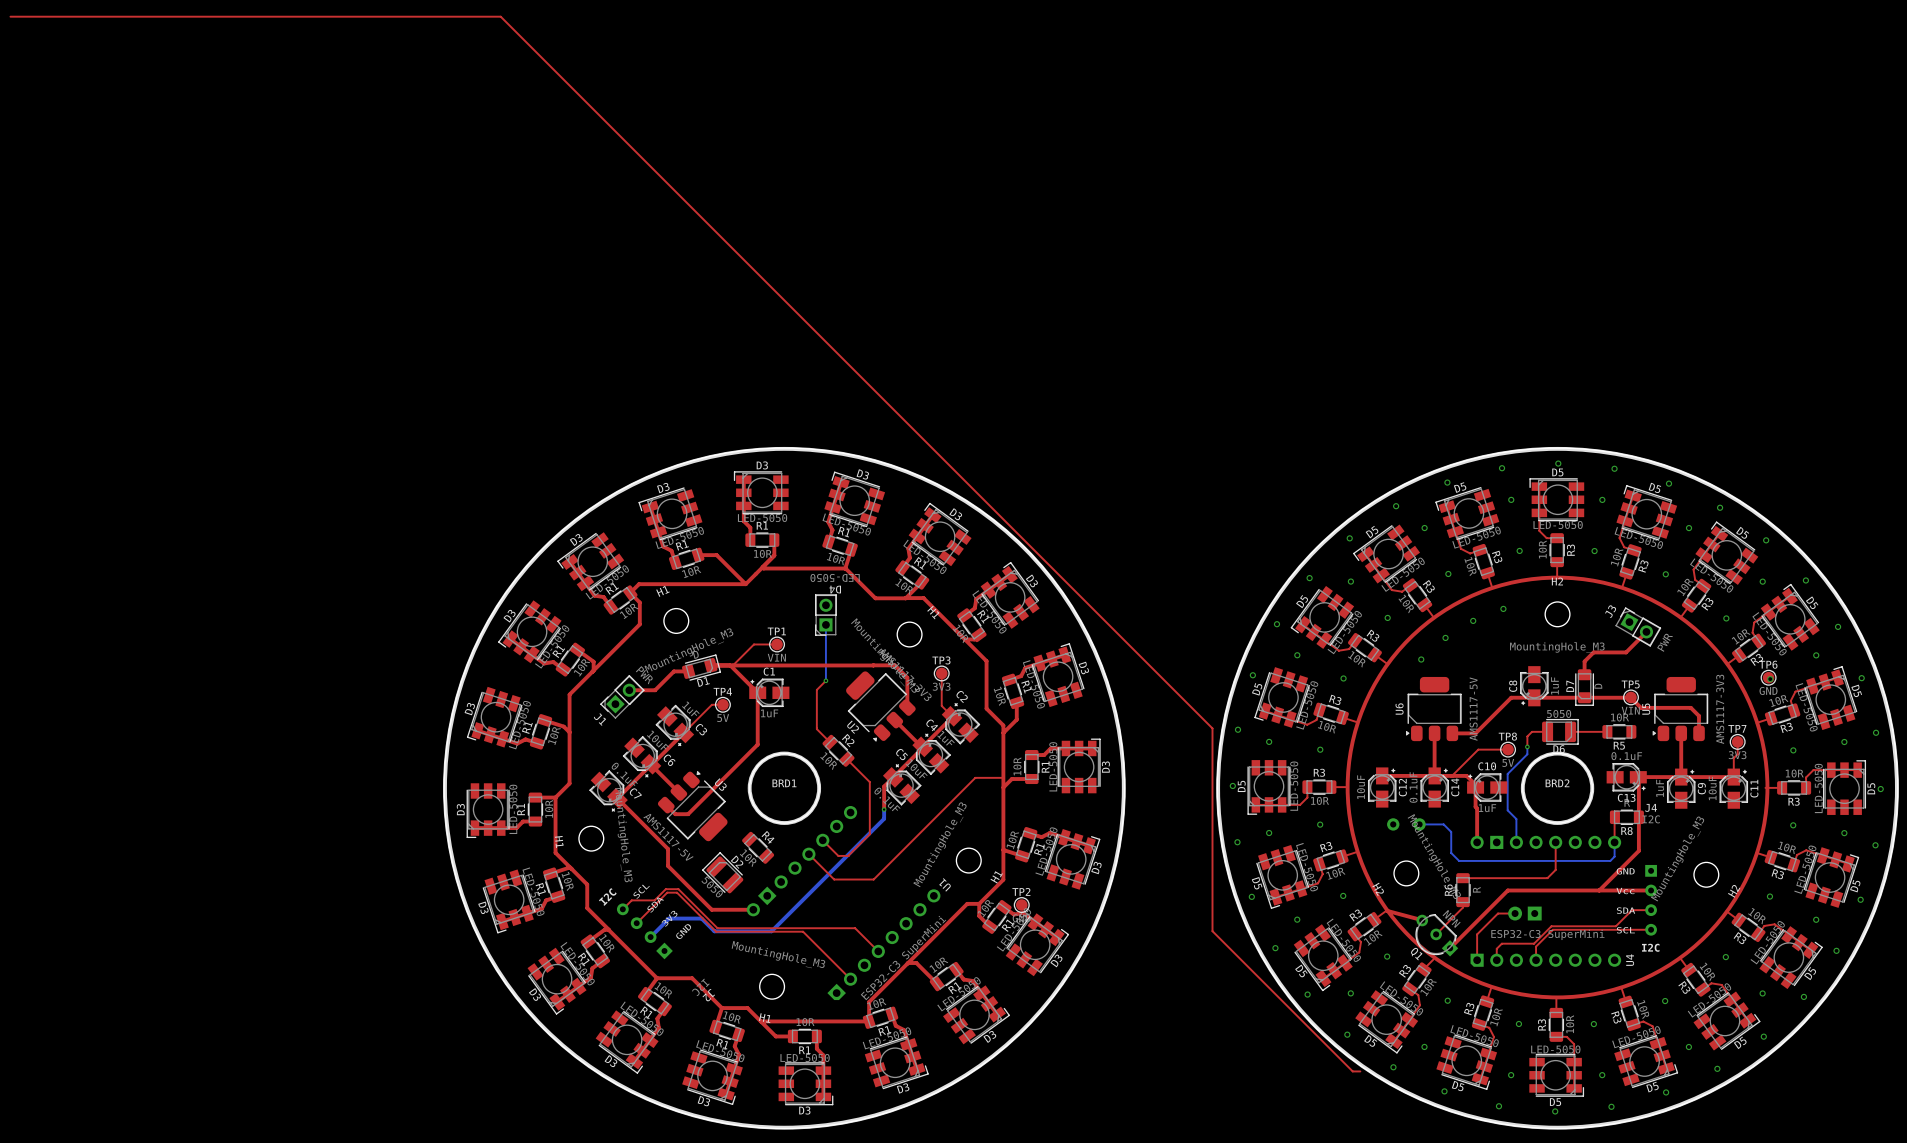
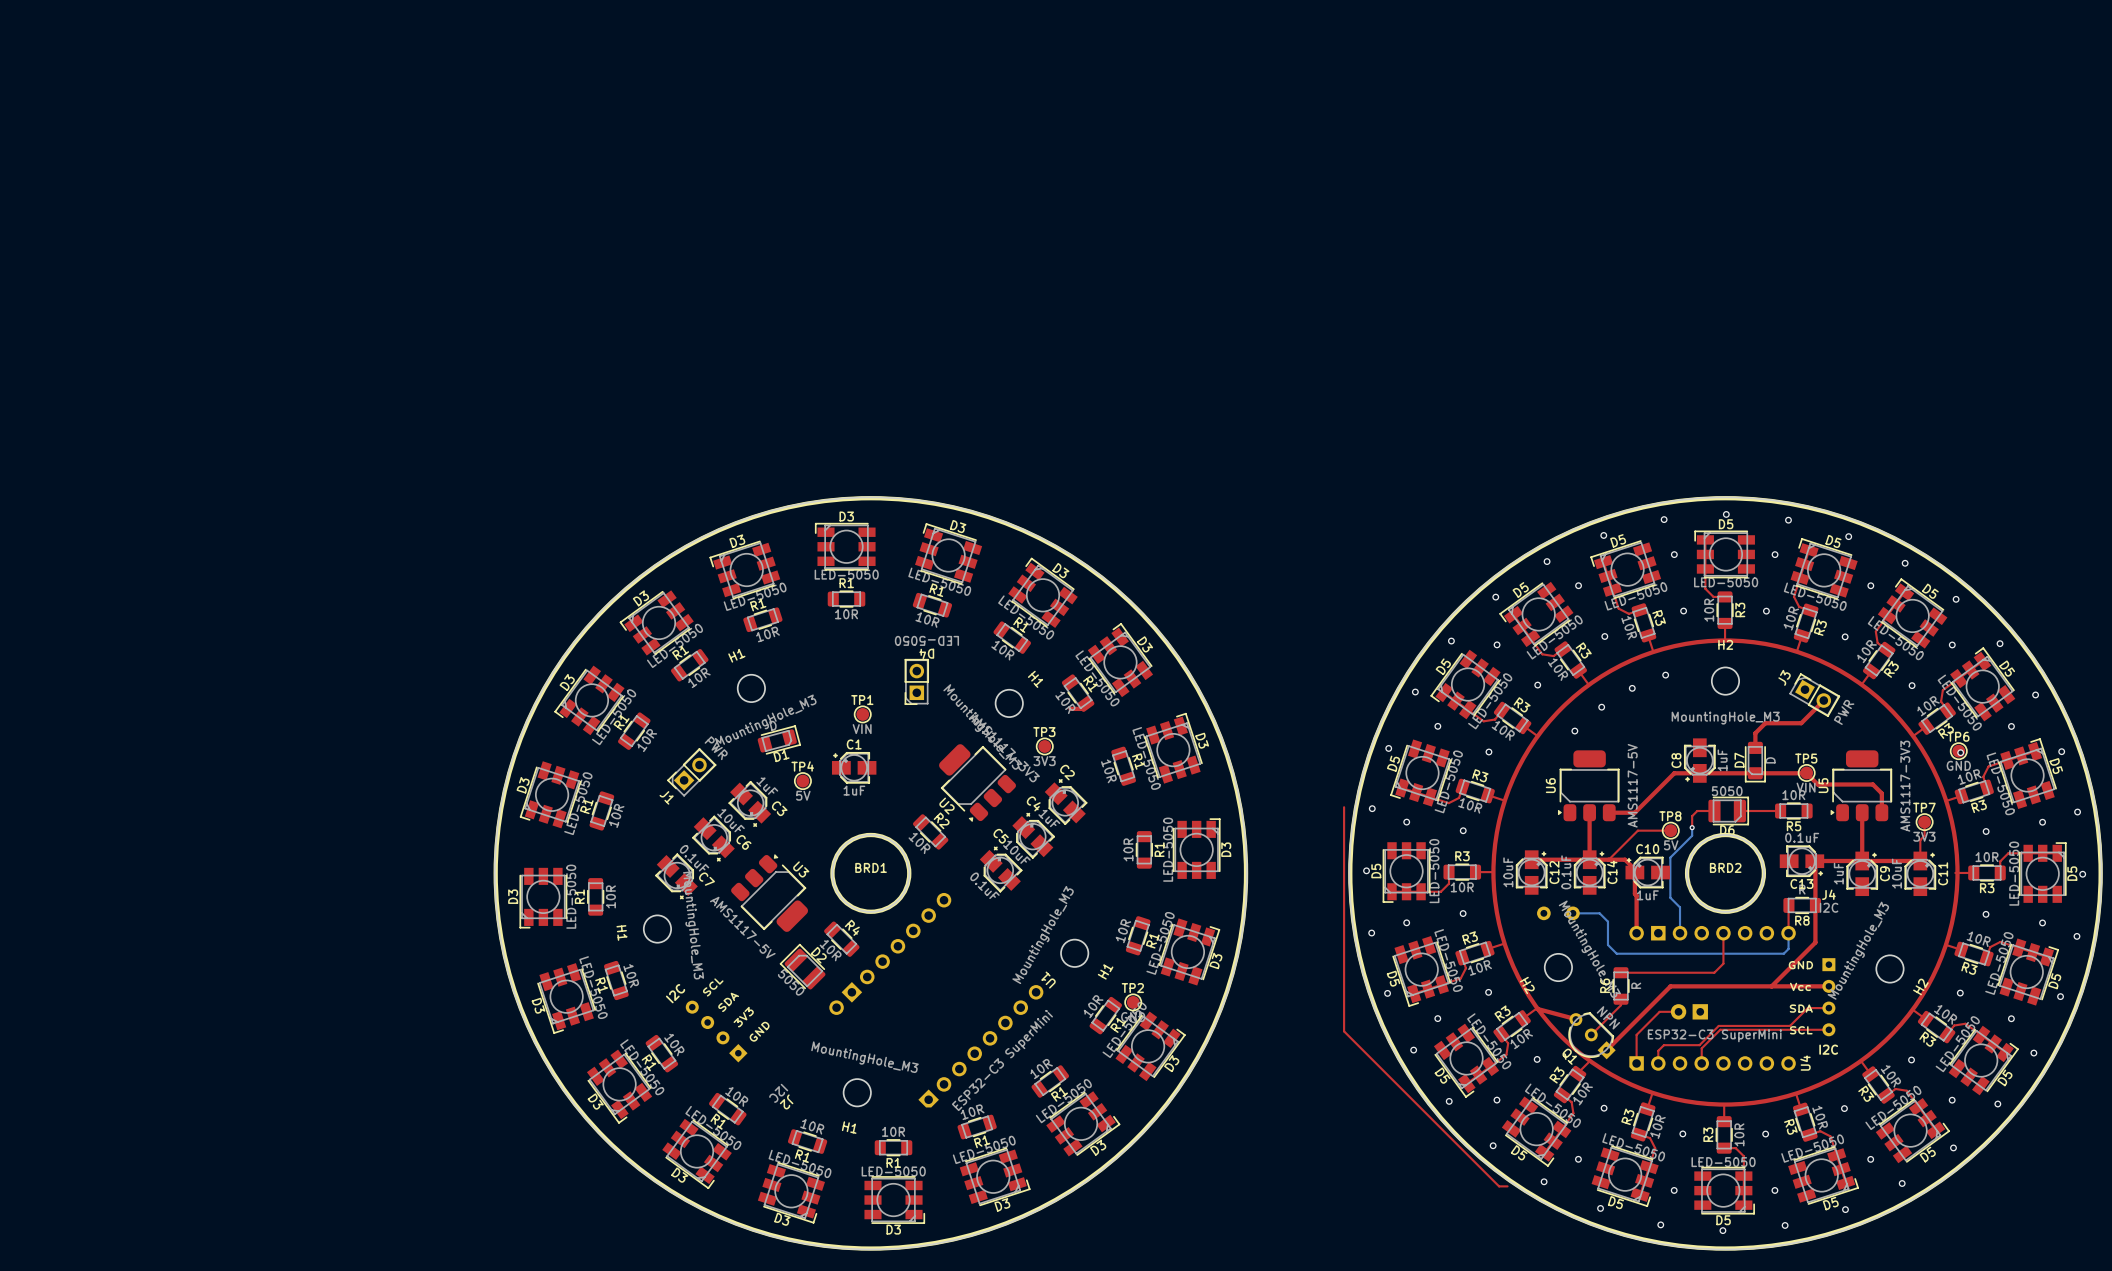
top track: (10, 16) (500, 16) (1212, 728) -> none
top track: (743, 479) (743, 521) (750, 527) (750, 540) -> none
top track: (841, 482) (828, 521) (832, 530) (828, 541) -> none
top track: (650, 507) (663, 546) (671, 550) (675, 562) -> none
top track: (932, 515) (908, 548) (909, 557) (902, 567) -> none
top track: (774, 540) (774, 555) (745, 584) -> none
top track: (851, 549) (845, 568) -> none
top track: (698, 555) (716, 555) (745, 584) -> none
top track: (569, 562) (594, 595) (603, 597) (610, 607) -> none
top track: (762, 567) (845, 568) (875, 598) (905, 598) (921, 582) -> none
top track: (1009, 574) (976, 599) (974, 608) (964, 615) -> none
top track: (745, 584) (639, 584) (630, 592) (639, 602) (639, 624) (569, 694) (569, 783) (555, 797) -> none
top track: (905, 598) (923, 598) (986, 661) (986, 708) (1003, 725) (1003, 879) (979, 903) -> none
bottom track: (825, 624) (825, 680) -> none
top track: (510, 639) (544, 663) (553, 662) (563, 669) -> none
top track: (777, 644) (753, 644) (732, 665) -> none
top track: (577, 649) (593, 661) (593, 670) -> none
top track: (1064, 655) (1025, 667) (1021, 676) (1009, 679) -> none
top track: (710, 665) (894, 665) (907, 677) (907, 707) -> none
top track: (730, 665) (757, 692) (757, 744) (688, 814) (675, 814) (666, 805) -> none
top track: (688, 671) (673, 671) (655, 690) (629, 690) -> none
top track: (941, 673) (941, 705) (952, 717) (922, 746) -> none
top track: (825, 680) (816, 689) (816, 729) (830, 742) -> none
via: (825, 680) -> none
top track: (1016, 702) (1016, 719) (1003, 732) -> none
top track: (722, 704) (711, 704) (617, 798) (668, 848) (668, 865) (711, 909) (753, 909) -> none
top track: (544, 720) (563, 726) (569, 732) -> none
top track: (894, 720) (922, 746) -> none
top track: (477, 730) (517, 743) (525, 739) (537, 743) -> none
top track: (922, 746) (884, 786) (884, 809) -> none
top track: (1092, 748) (1050, 748) (1044, 755) (1031, 755) -> none
top track: (846, 759) (869, 782) (869, 834) (848, 855) (838, 855) (822, 840) -> none
top track: (650, 764) (678, 792) -> none
top track: (1003, 777) (975, 777) (873, 879) (834, 879) (808, 854) -> none
top track: (1031, 779) (1011, 779) (1003, 787) -> none
top track: (535, 797) (555, 797) -> none
top track: (555, 797) (555, 852) (587, 884) (587, 908) (608, 929) -> none
bottom track: (884, 809) (884, 818) (771, 931) (714, 931) (701, 918) (669, 918) (650, 937) -> none
via: (884, 809) -> none
top track: (535, 821) (523, 821) (516, 828) (474, 828) -> none
top track: (1029, 833) (1041, 837) (1049, 832) (1089, 845) -> none
top track: (1003, 849) (1022, 856) -> none
top track: (570, 867) (550, 873) -> none
top track: (557, 896) (546, 900) (541, 908) (502, 921) -> none
top track: (979, 903) (979, 916) (989, 926) -> none
top track: (979, 903) (967, 903) (869, 1001) (869, 1021) (760, 1021) -> none
top track: (1003, 907) (1013, 914) (1023, 913) (1056, 937) -> none
top track: (622, 909) (631, 900) (654, 900) (665, 889) (678, 889) (717, 928) (855, 928) (878, 951) -> none
top track: (636, 923) (667, 892) (677, 892) (716, 931) (803, 931) (850, 979) -> none
top track: (608, 929) (604, 929) (588, 941) -> none
top track: (608, 929) (657, 978) -> none
top track: (602, 961) (592, 968) (590, 977) (557, 1001) -> none
top track: (908, 963) (916, 963) (937, 983) -> none
top track: (956, 969) (963, 979) (972, 980) (997, 1014) -> none
top track: (657, 978) (645, 994) -> none
top track: (657, 978) (692, 978) (721, 1008) -> none
top track: (664, 1008) (657, 1018) (658, 1027) (634, 1061) -> none
top track: (721, 1008) (747, 1008) (775, 1036) (792, 1036) -> none
top track: (721, 1008) (715, 1027) -> none
top track: (891, 1014) (895, 1025) (904, 1030) (916, 1069) -> none
top track: (738, 1034) (734, 1046) (738, 1054) (726, 1094) -> none
top track: (816, 1036) (816, 1048) (823, 1055) (823, 1096) -> none

